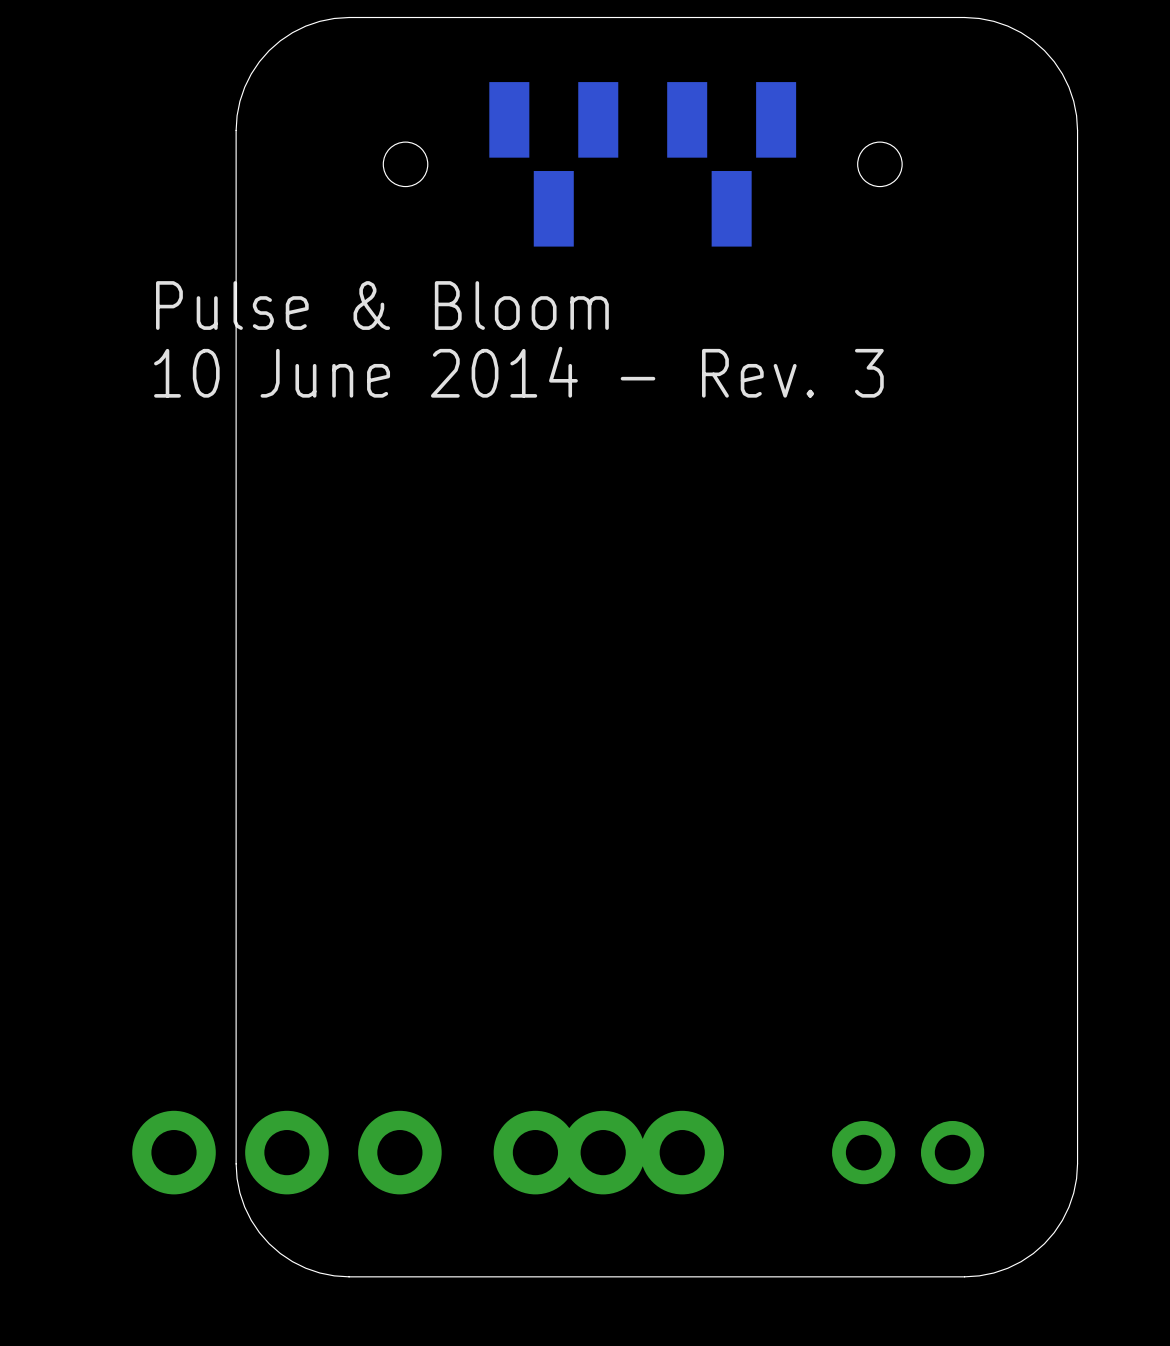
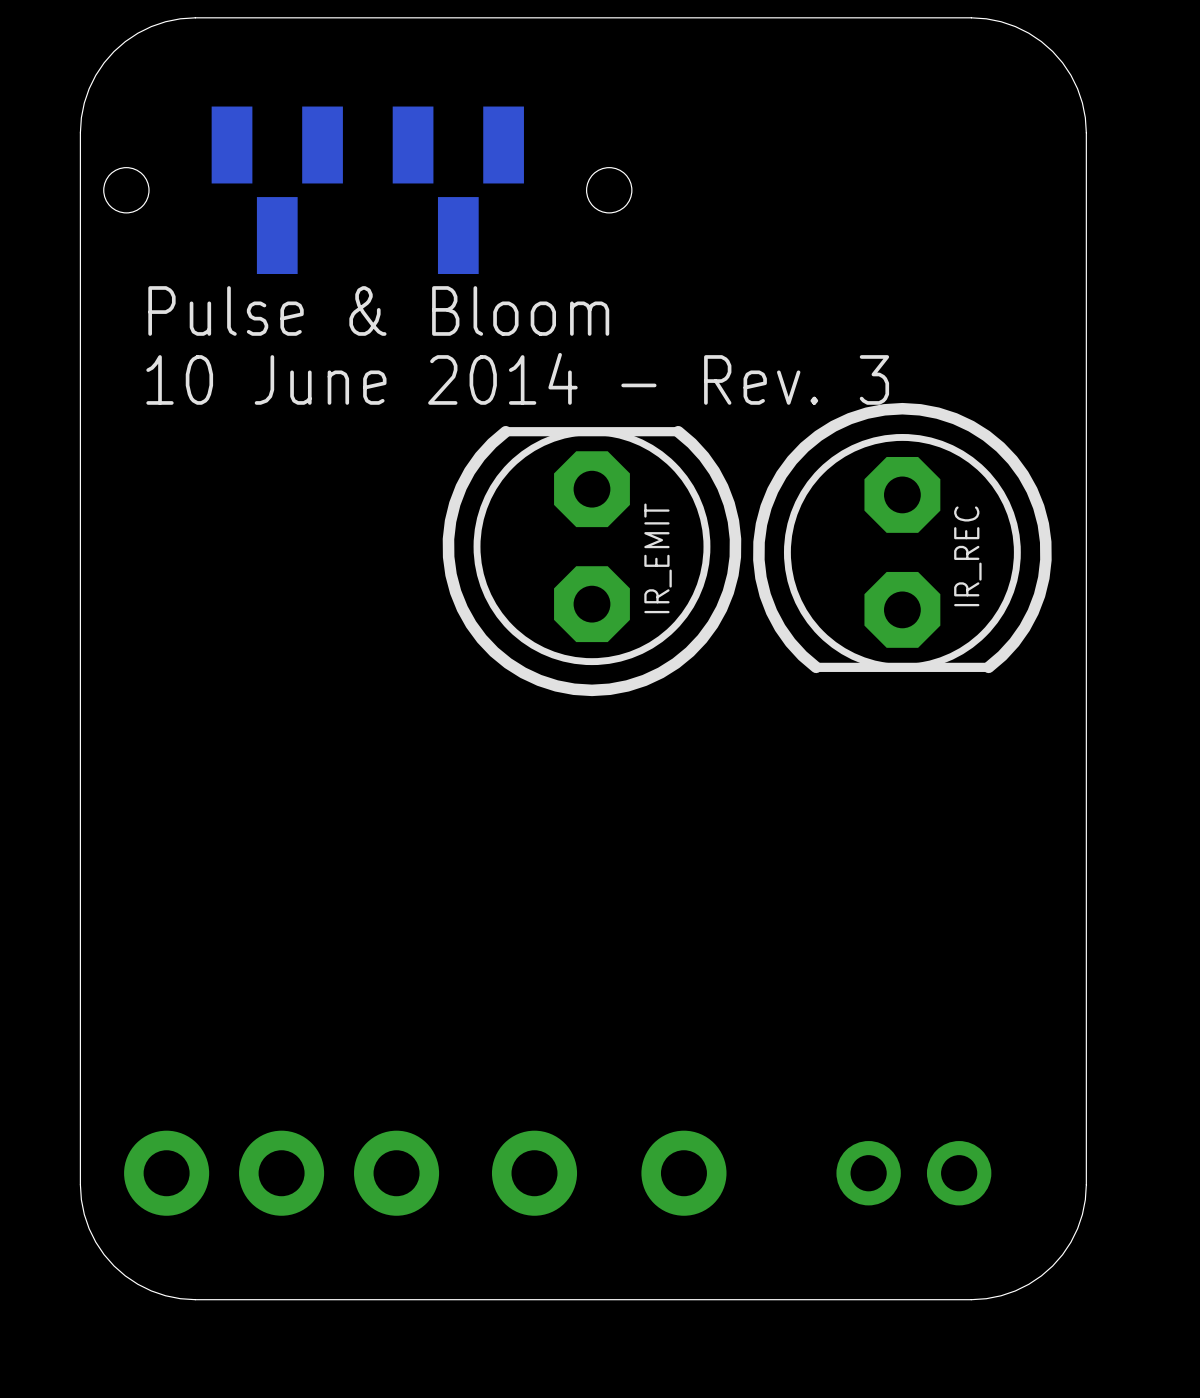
board edge: (349, 17) (319, 21) (305, 26) (280, 40) (269, 50) (259, 61) (244, 87) (239, 101) (236, 130) (237, 1178) (244, 1207) (259, 1232) (269, 1243) (280, 1253) (305, 1268) (319, 1272) (349, 1276) -> (344, 17) (195, 17) (165, 21) (151, 26) (125, 41) (104, 62) (89, 88) (84, 103) (80, 132) (80, 1184) (84, 1214) (95, 1242) (114, 1266) (137, 1284) (165, 1295) (195, 1299) (344, 1299)
part position: (642, 164) -> (367, 190)
IR_REC: none -> (902, 538)
IR_EMIT: none -> (591, 561)
part: (603, 1152) -> none

